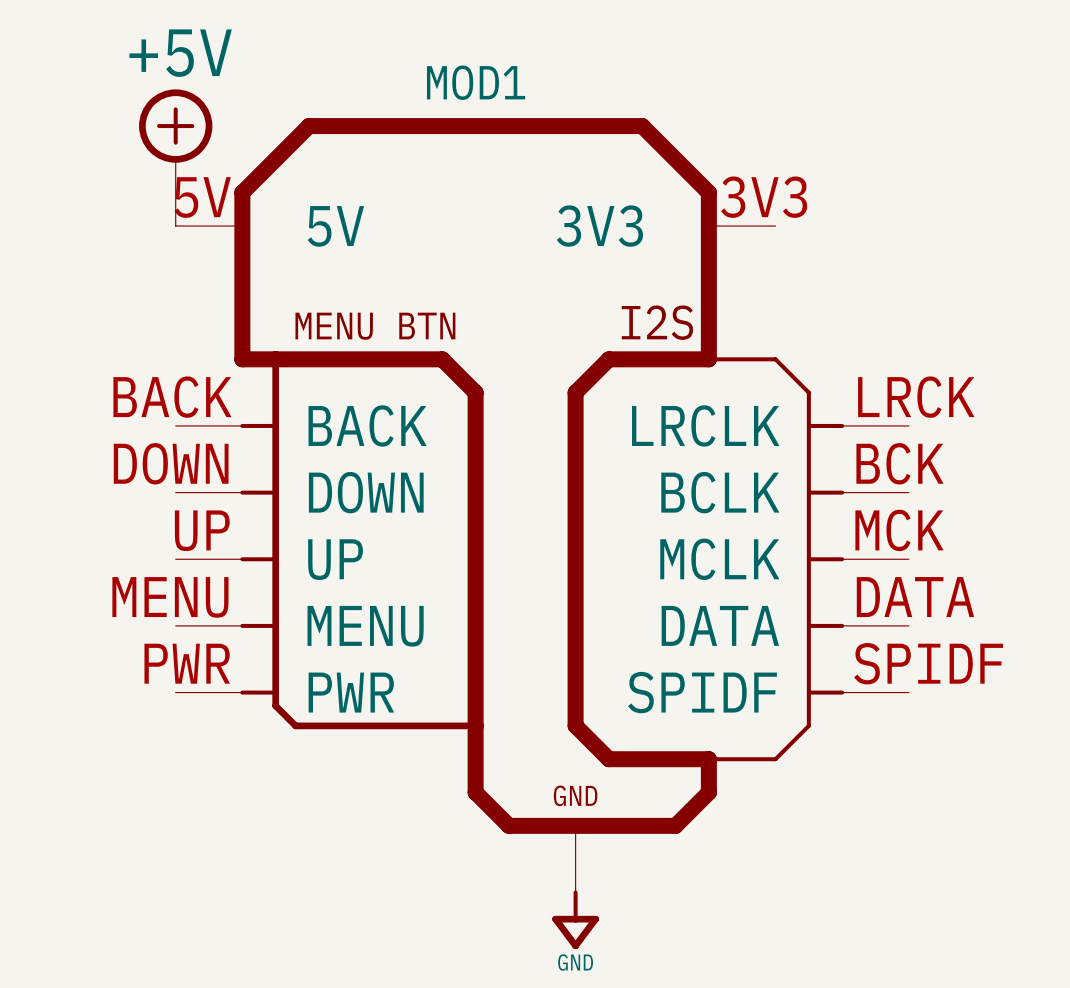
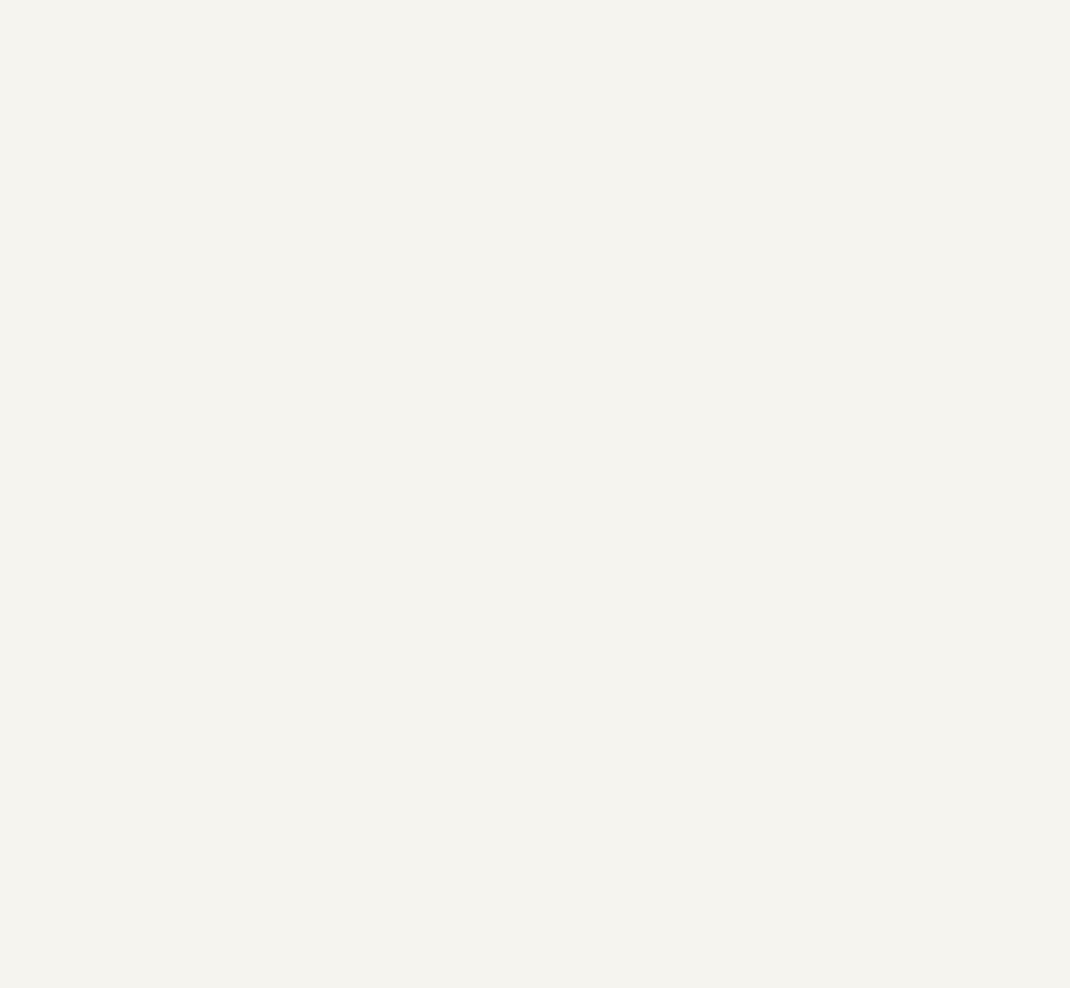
power symbol: +5V (175, 157) -> none
MOD1: (542, 505) -> none
power symbol: GND (575, 919) -> none

